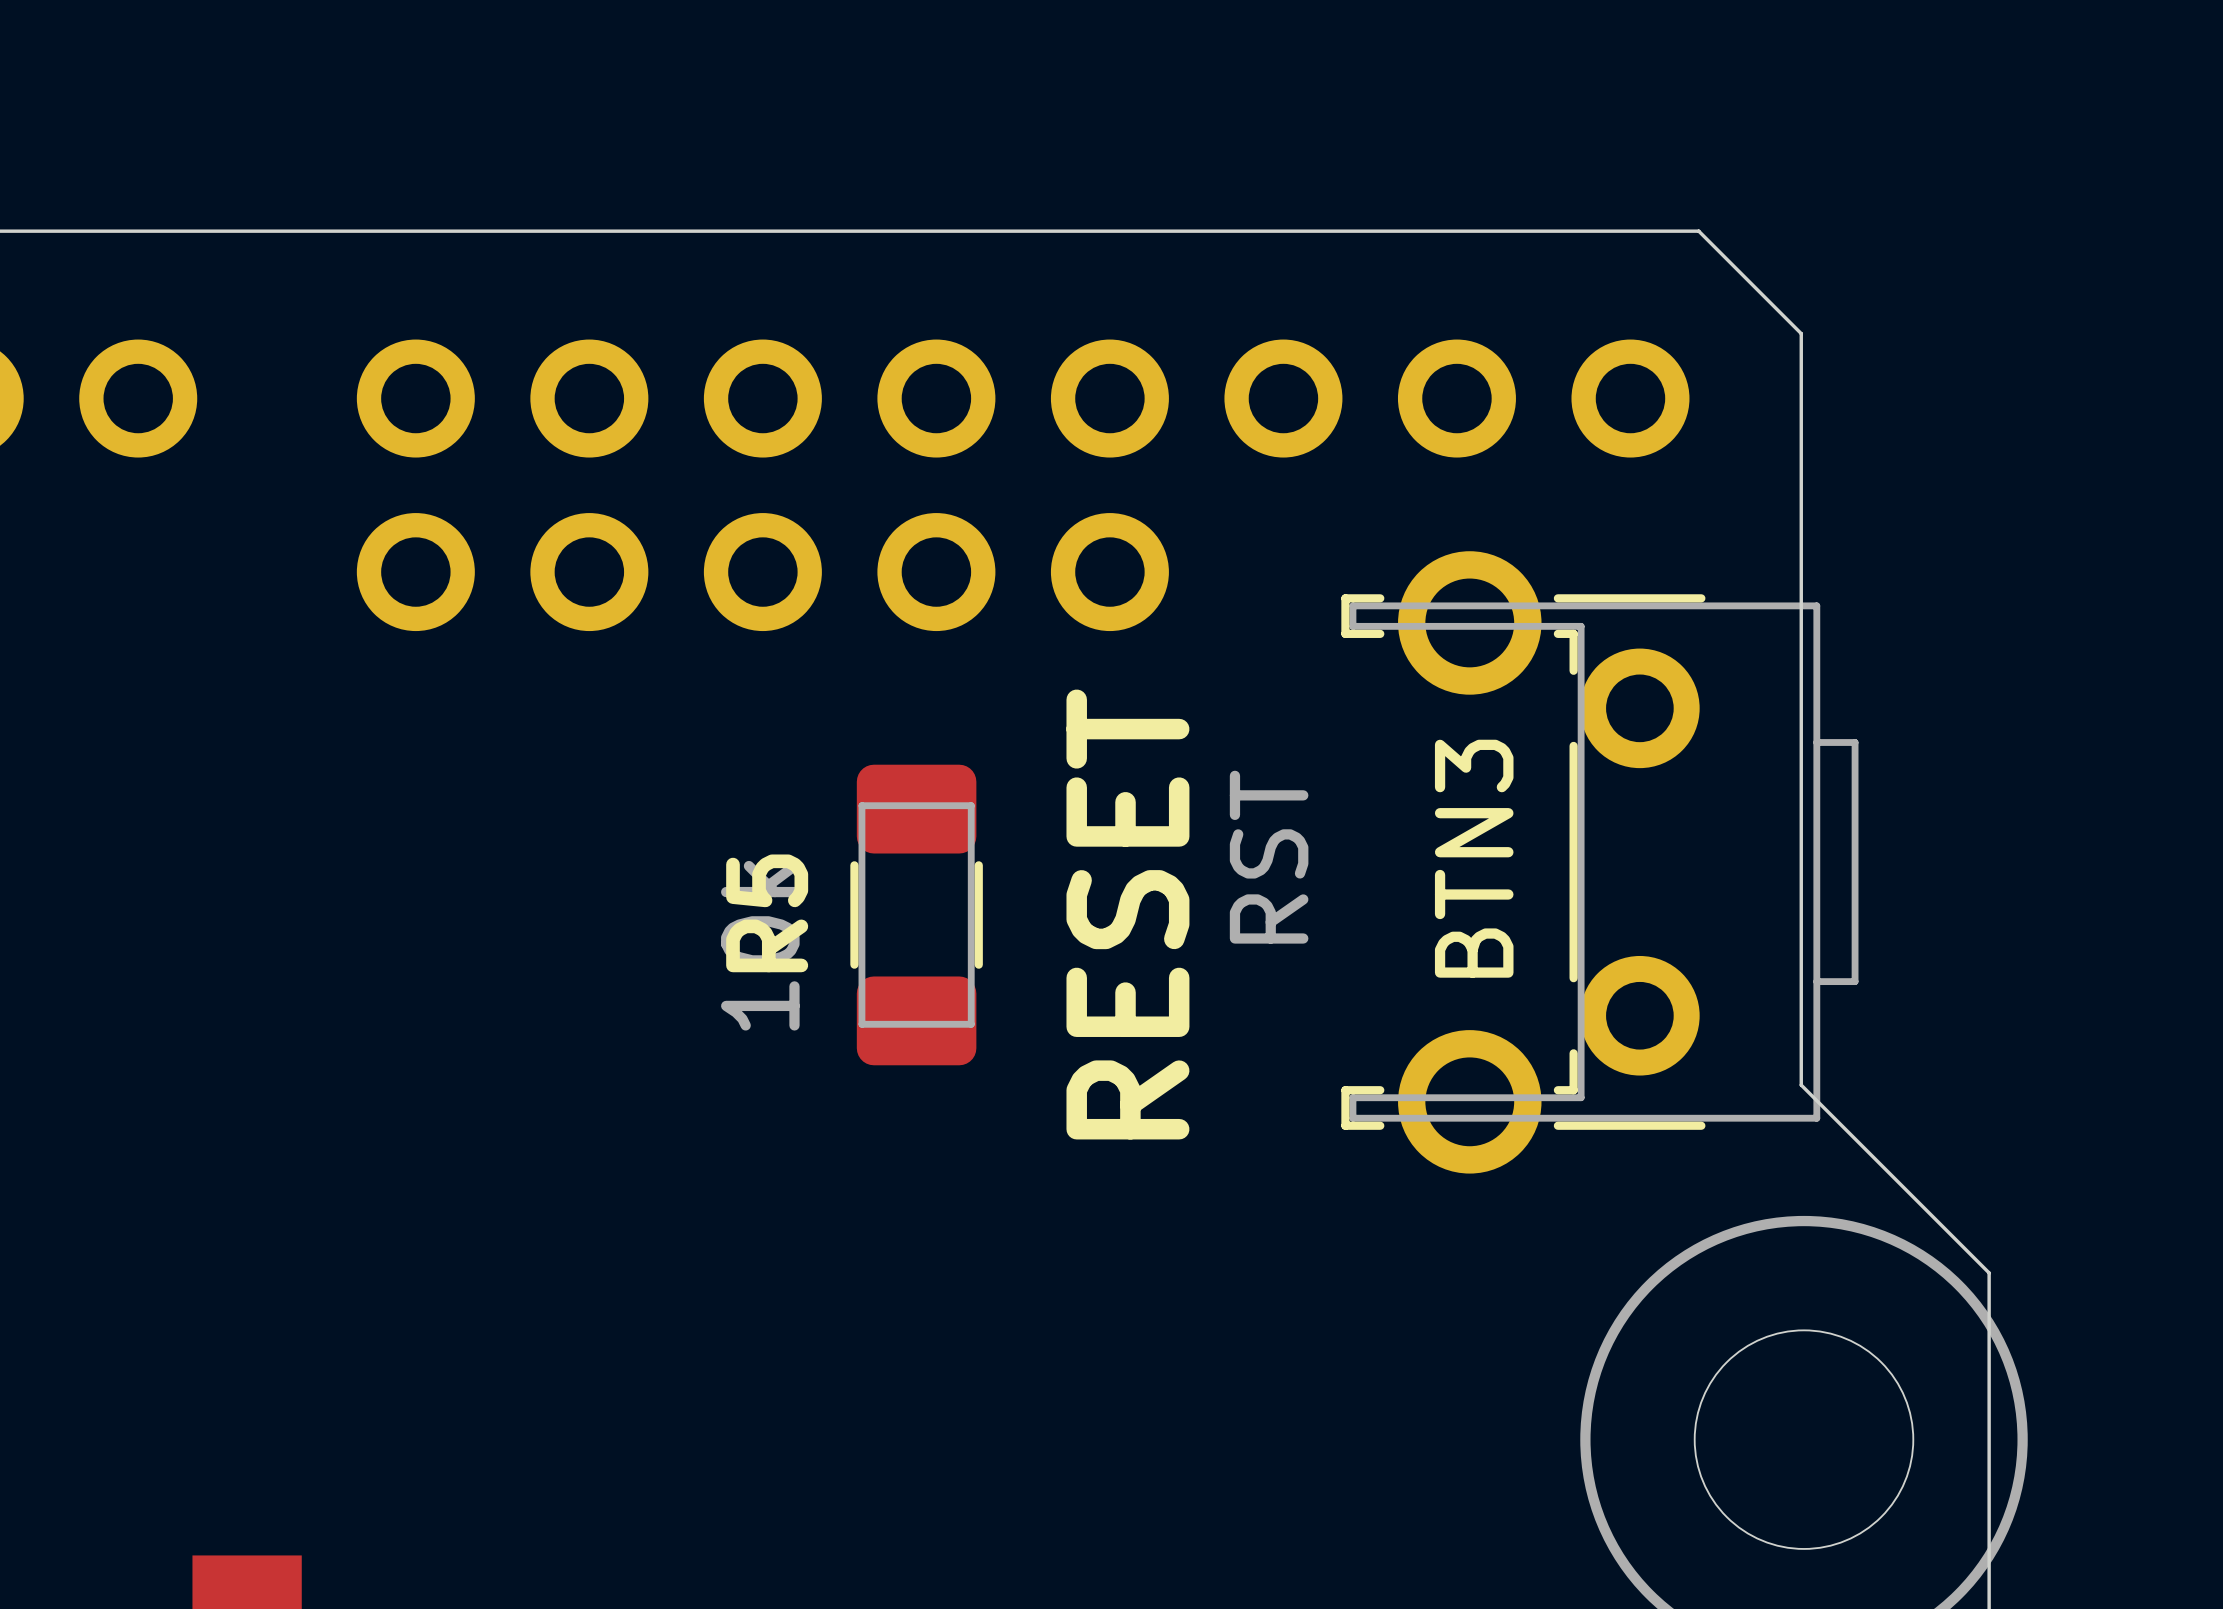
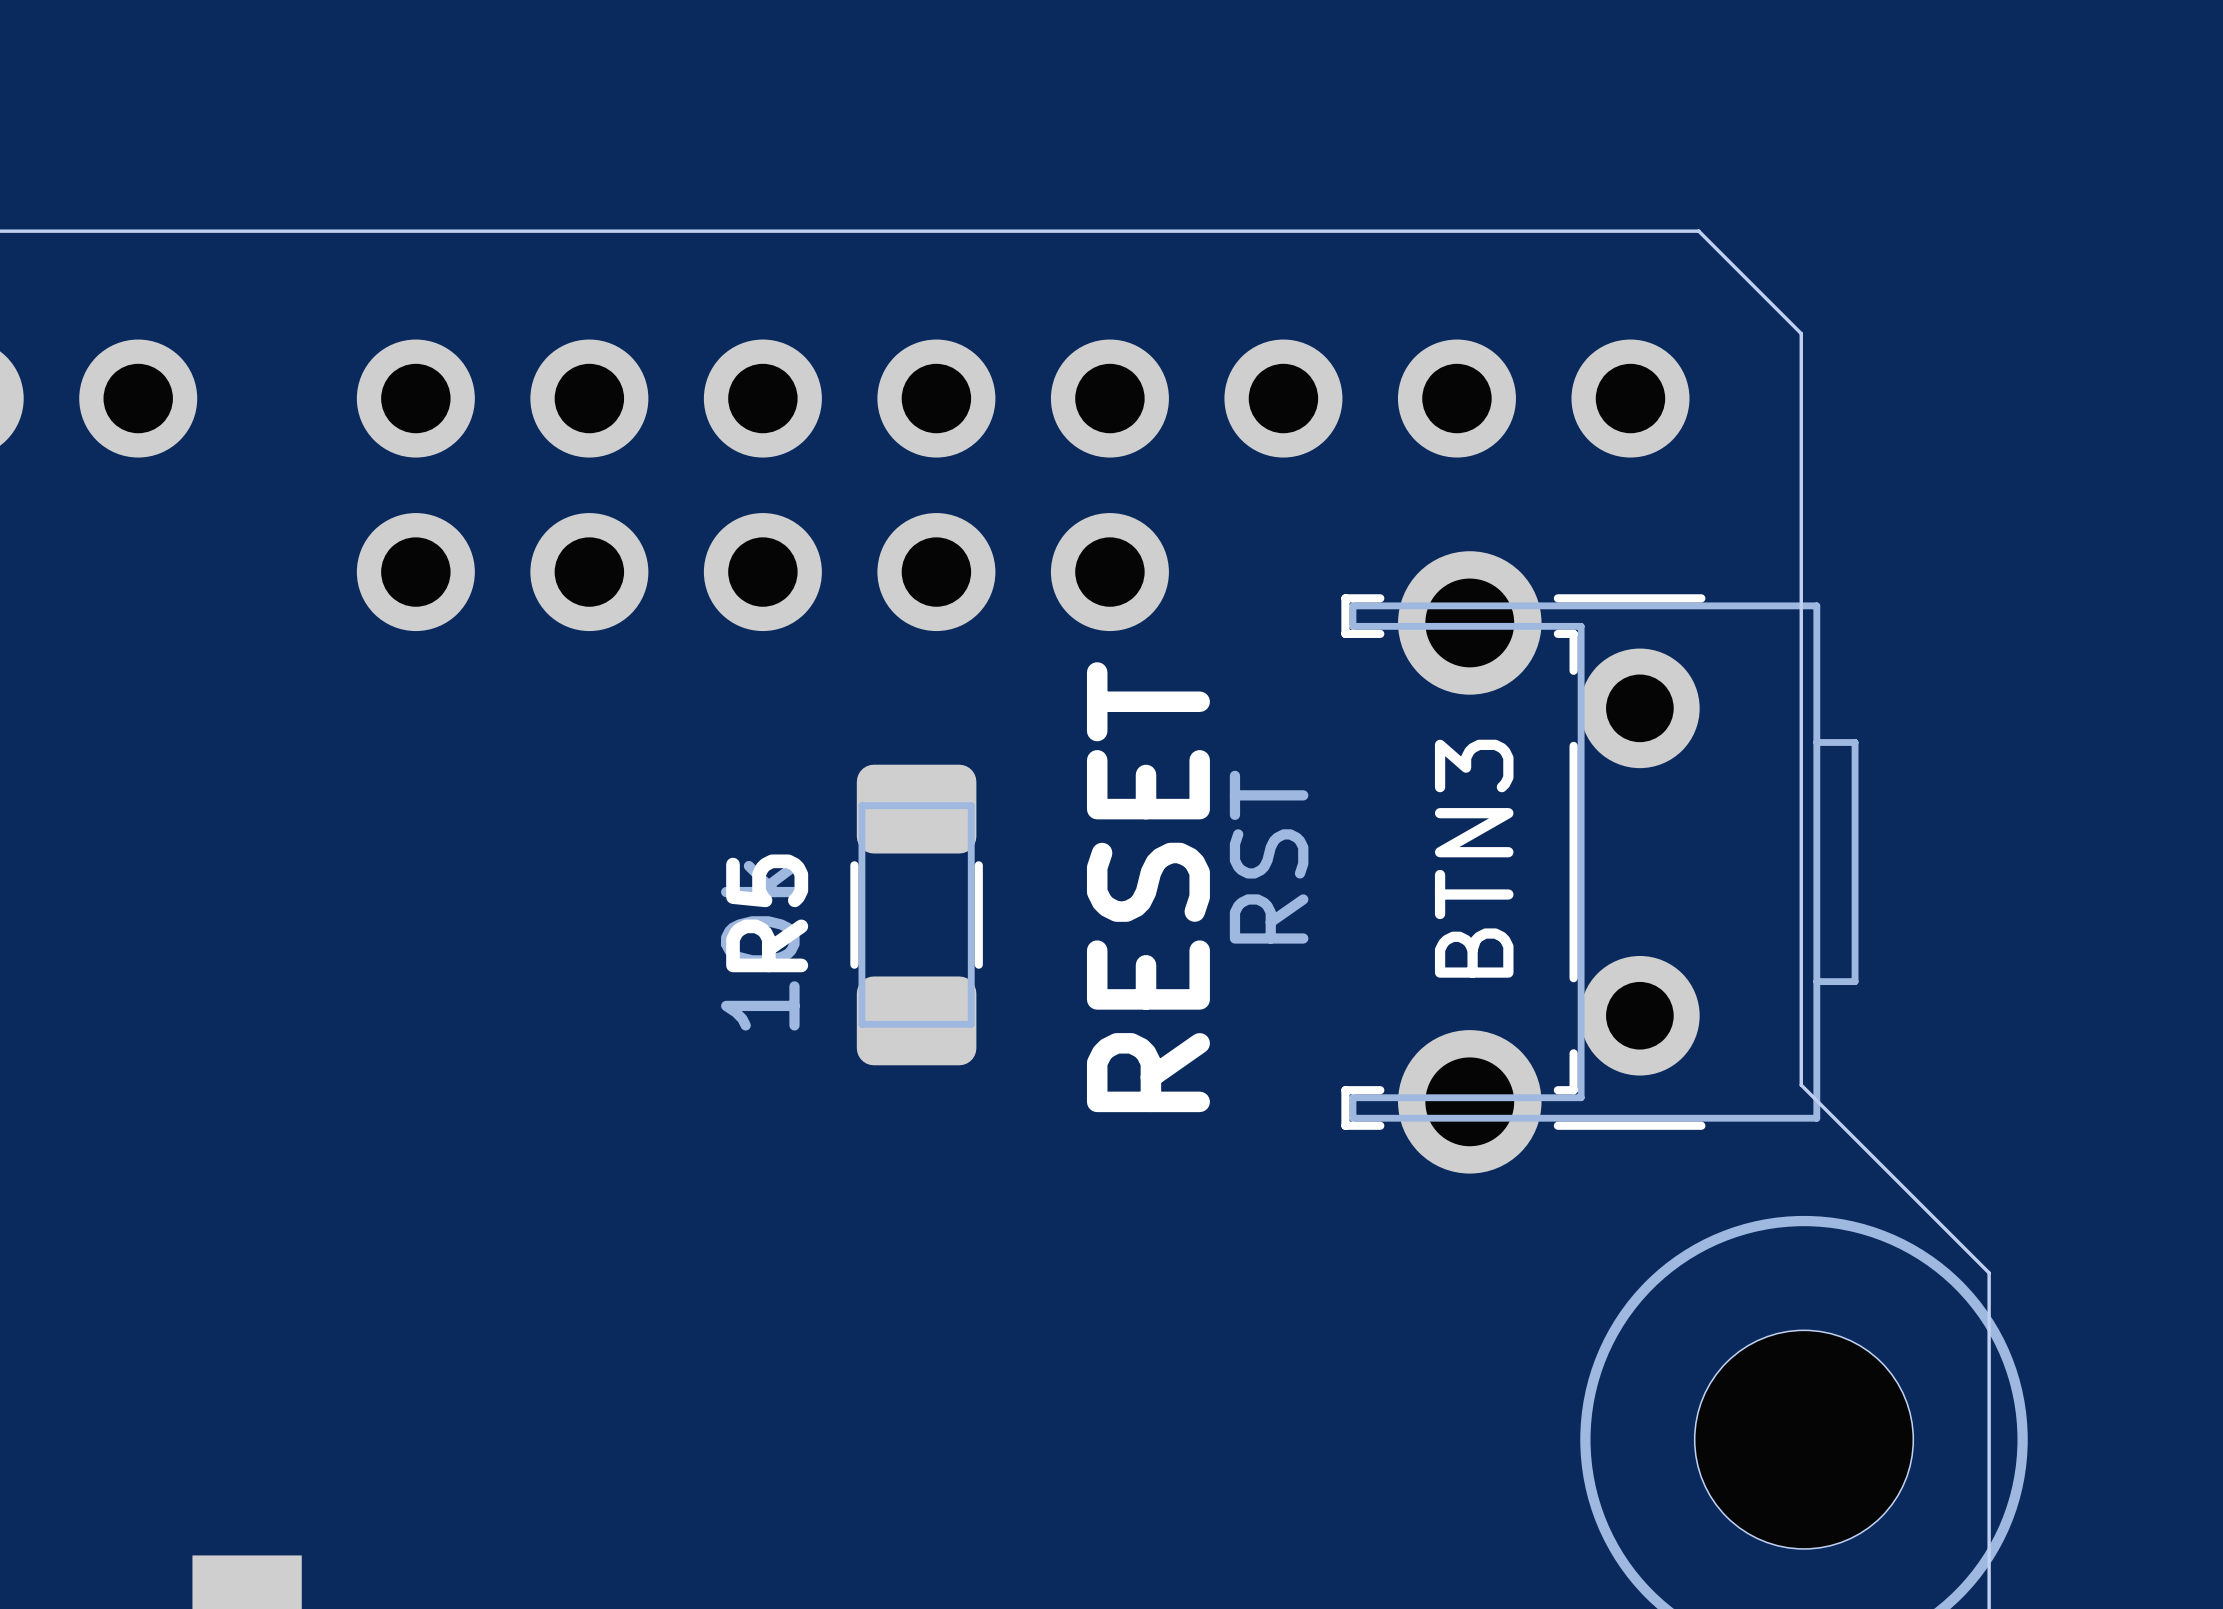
text position: RESET (1127, 914) -> RESET (1148, 887)

